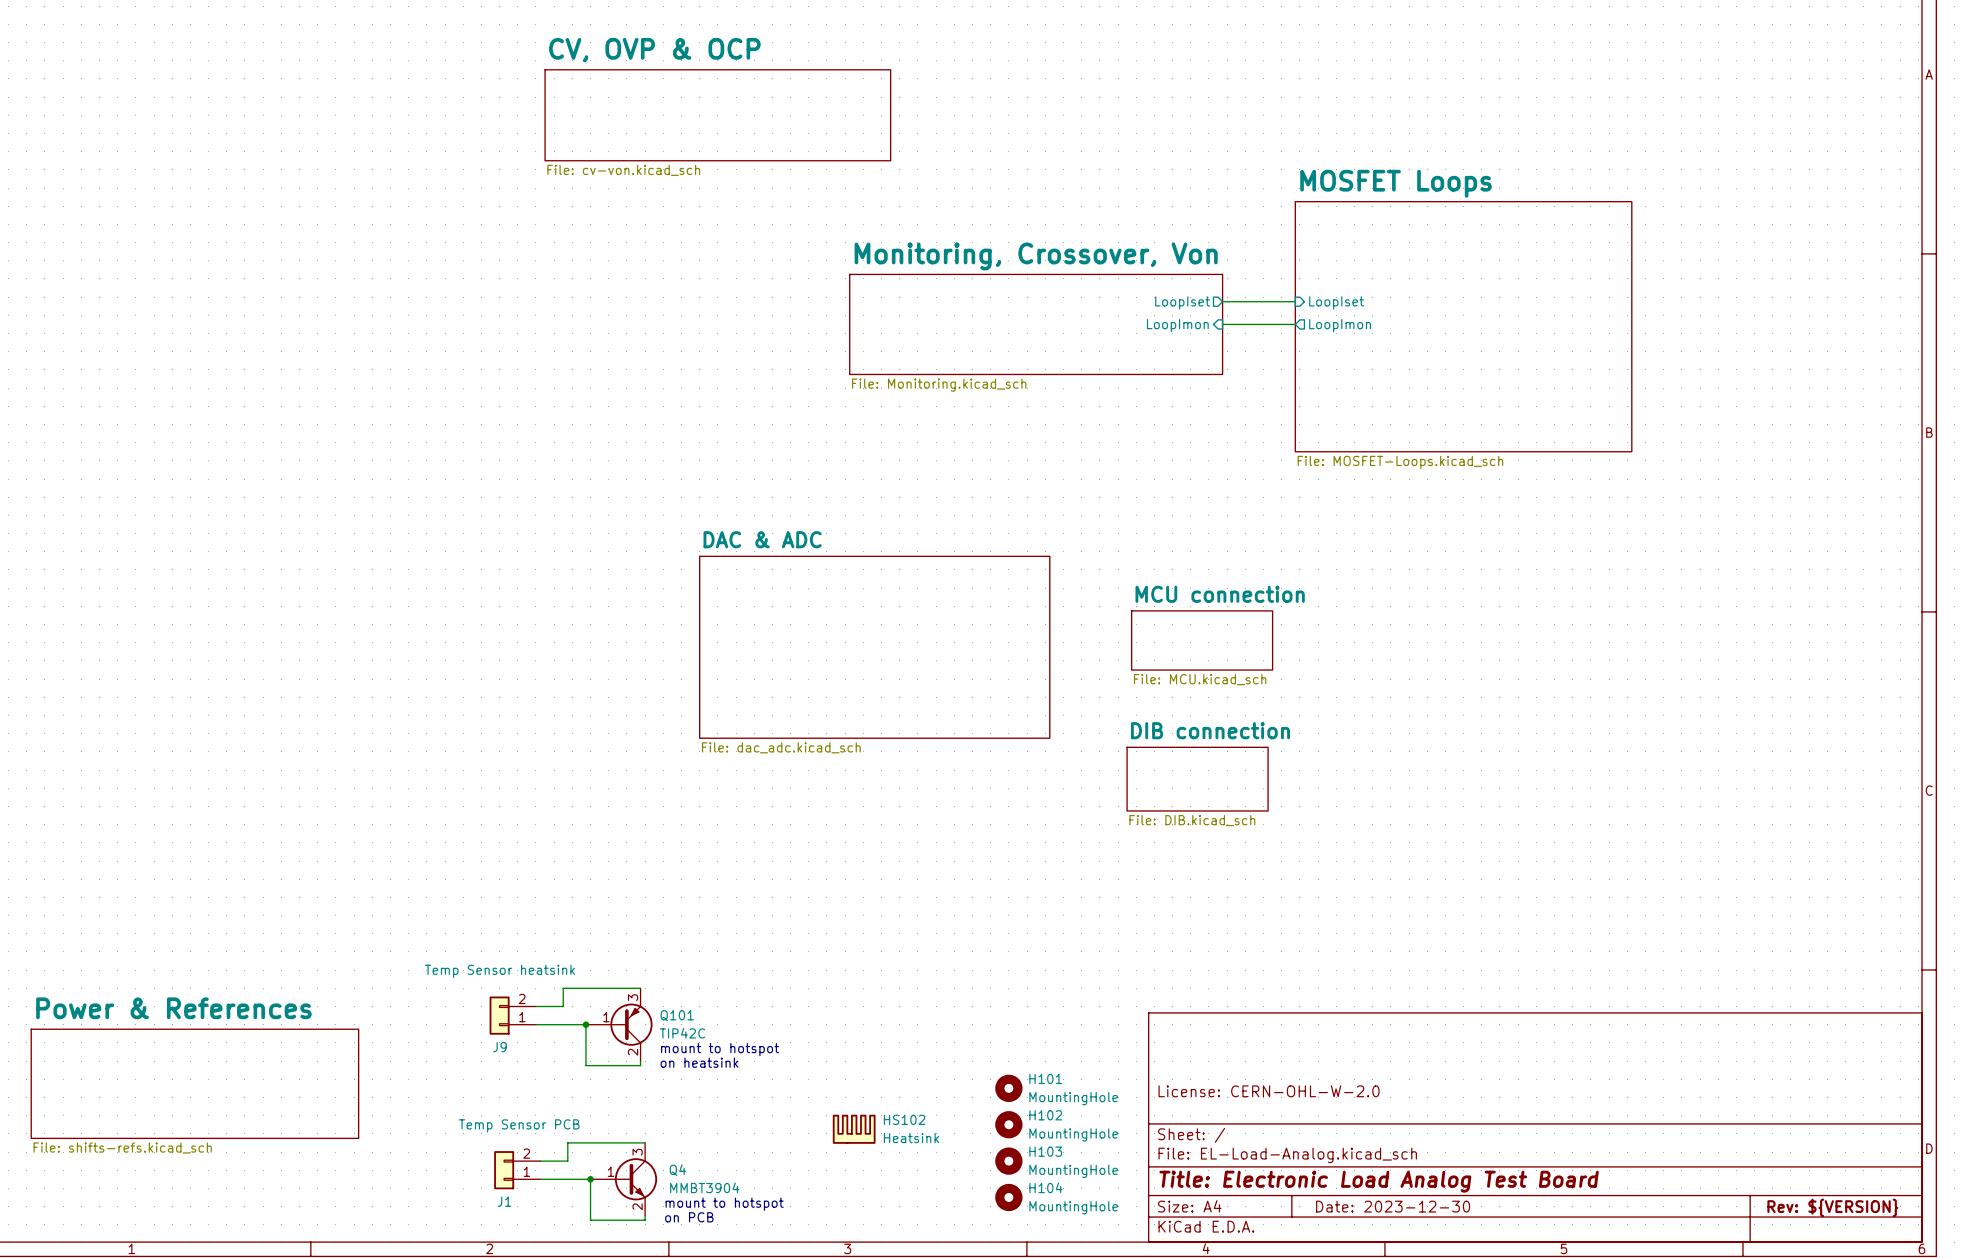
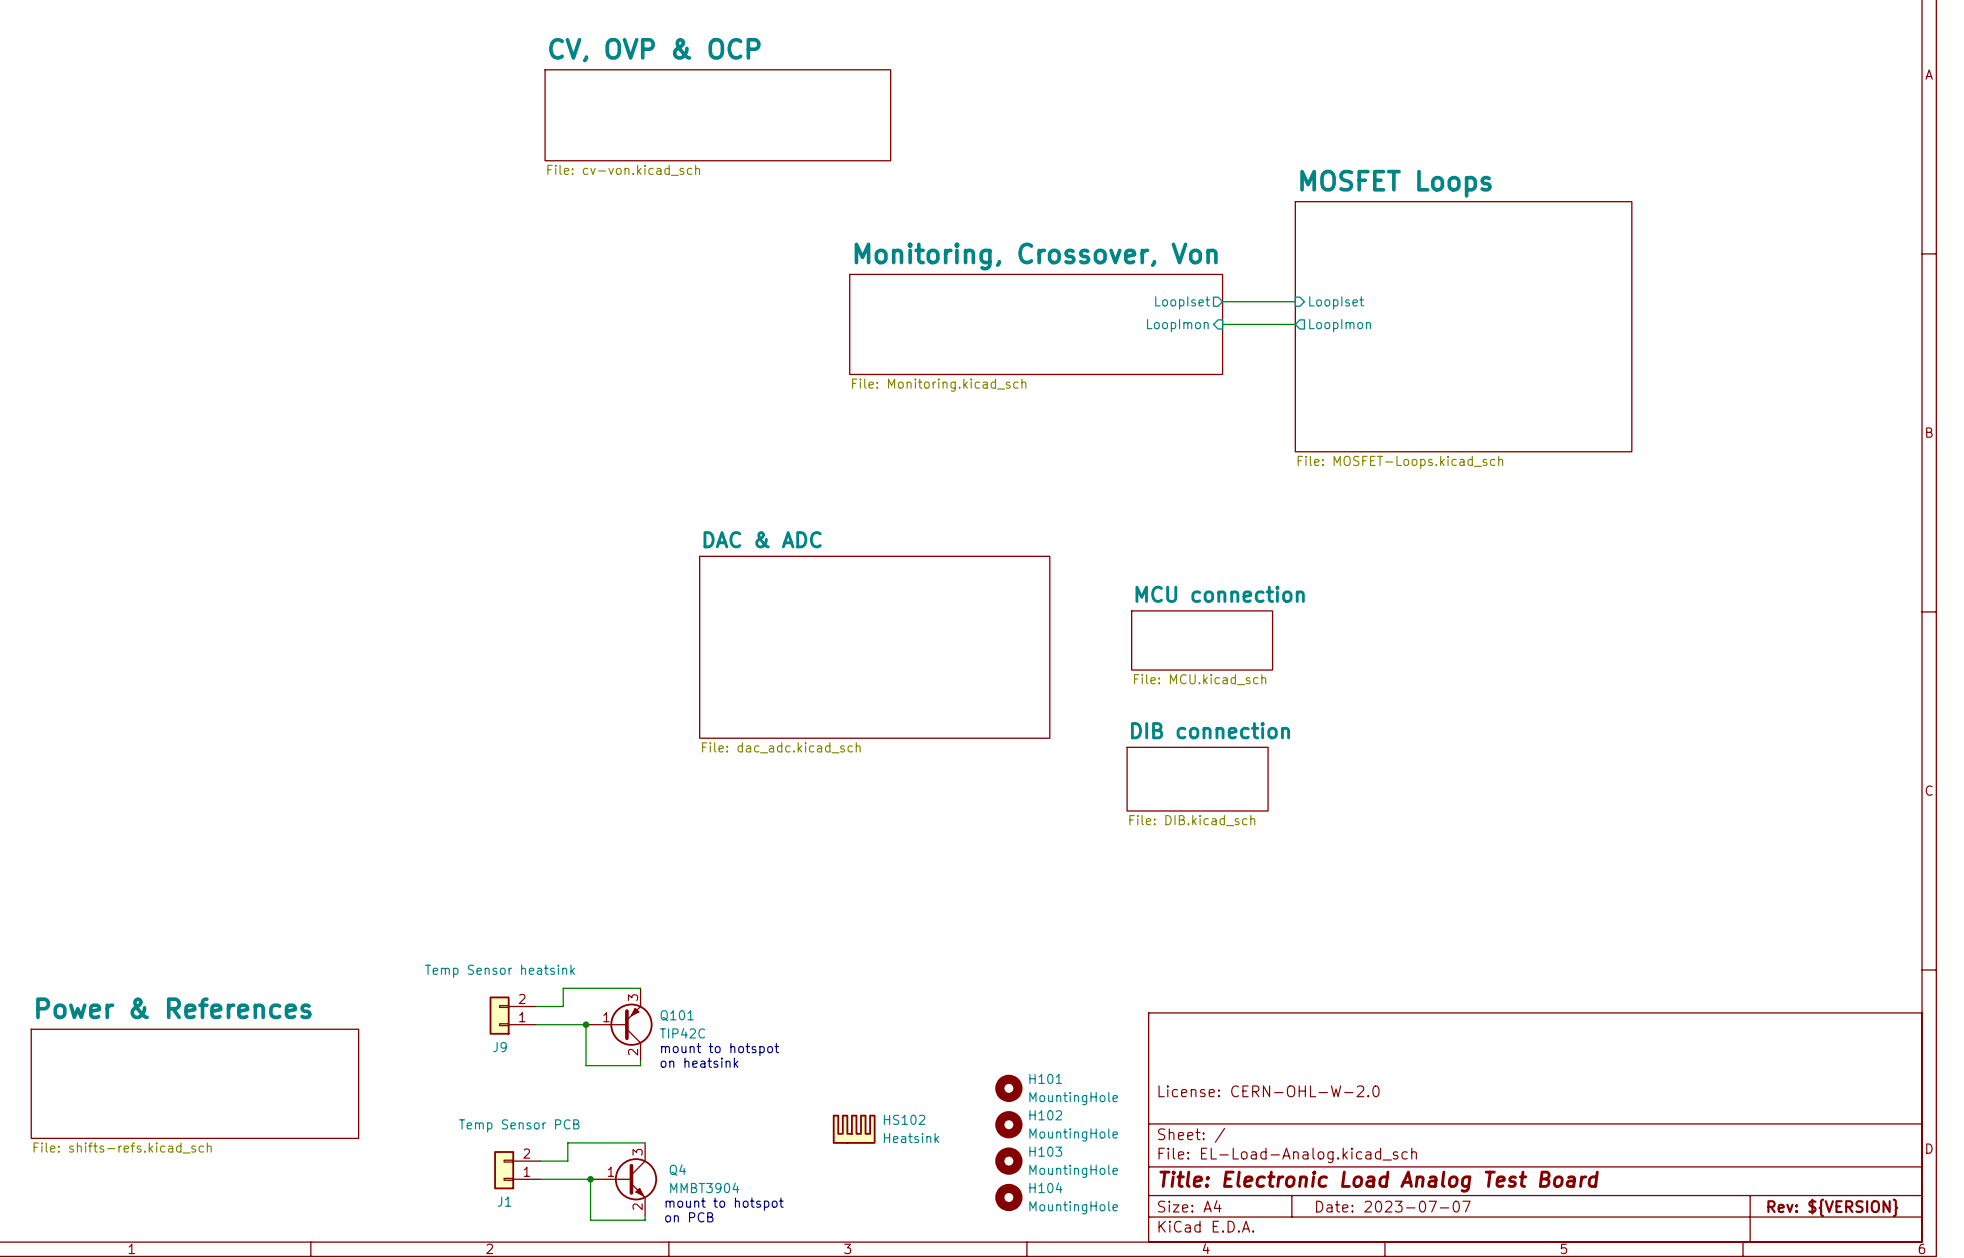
title block: Date: 2023-12-30 (1393, 1206) -> Date: 2023-07-07 (1393, 1206)

